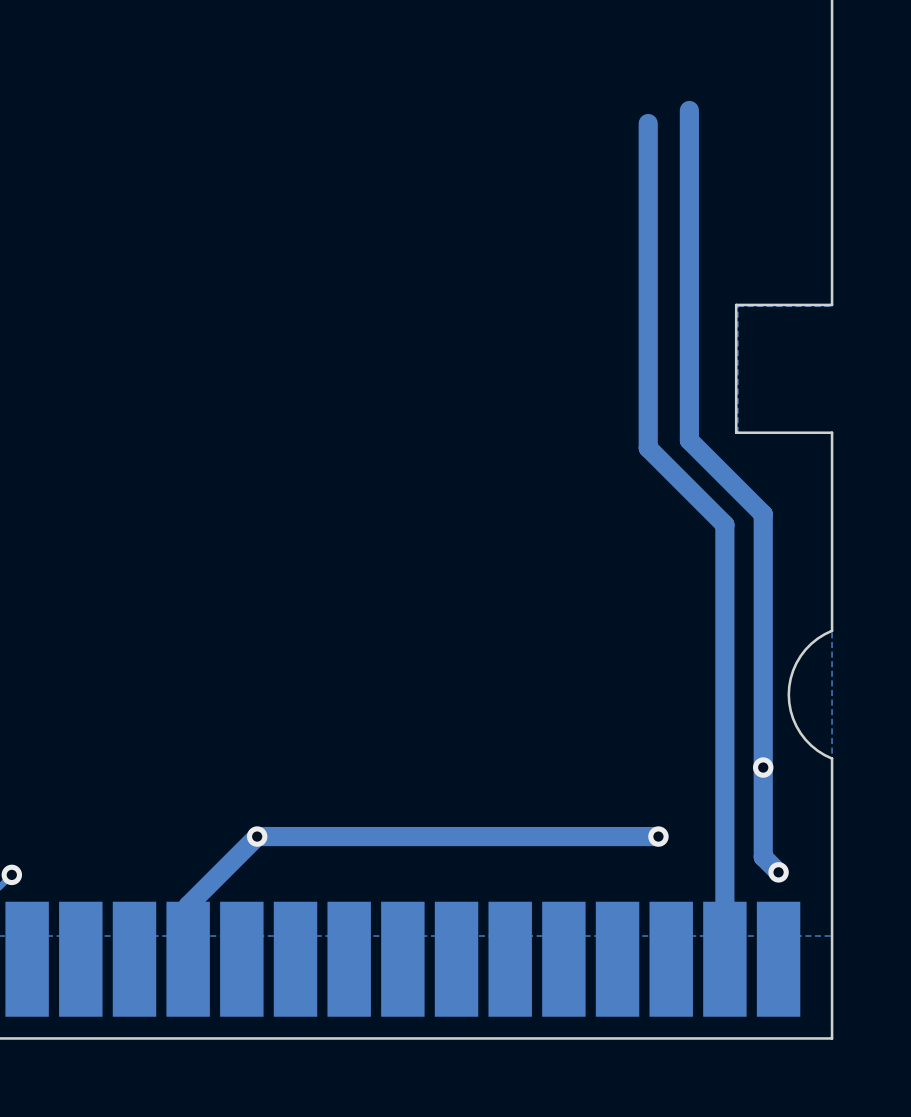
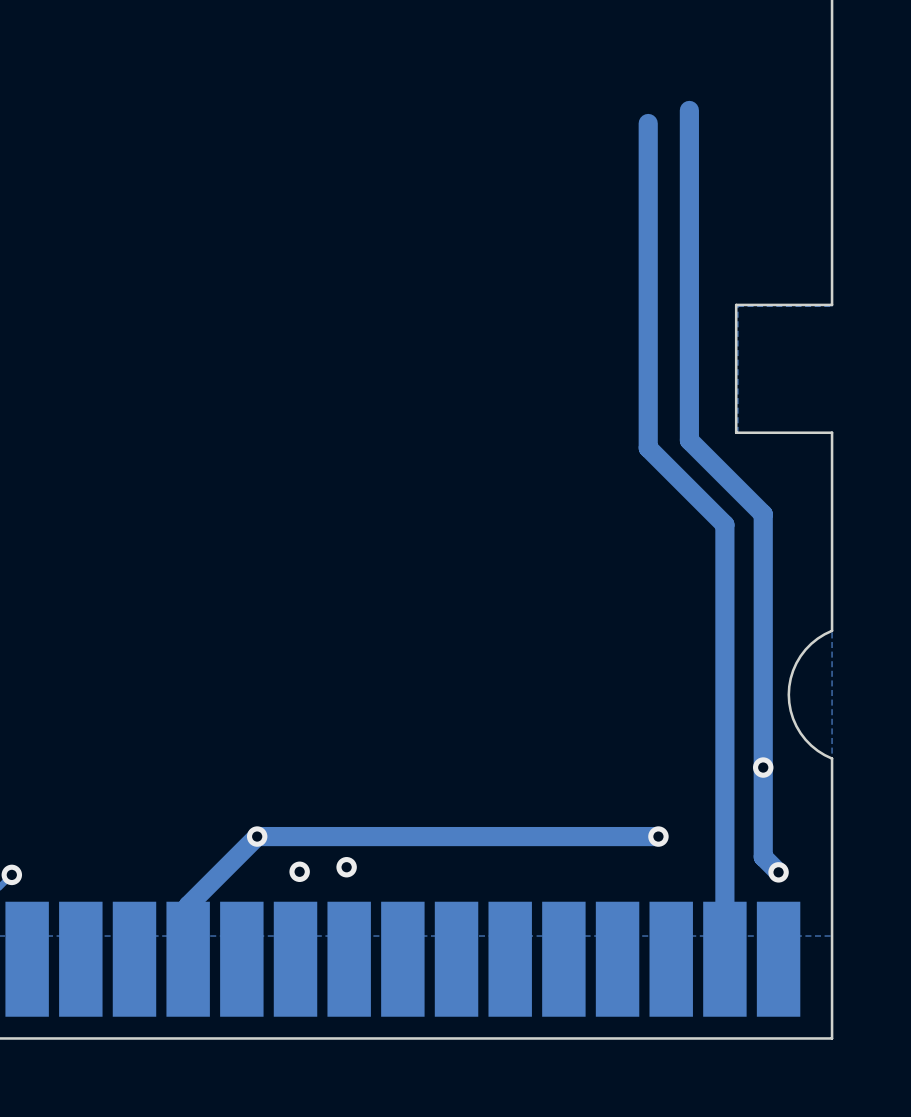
via: none -> (346, 867)
via: none -> (299, 871)

